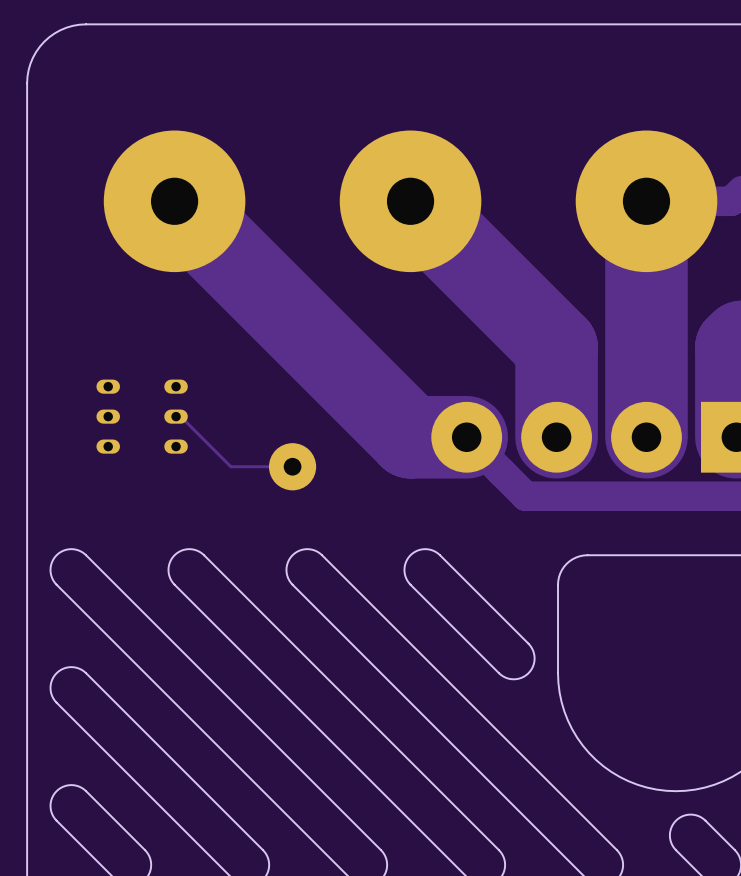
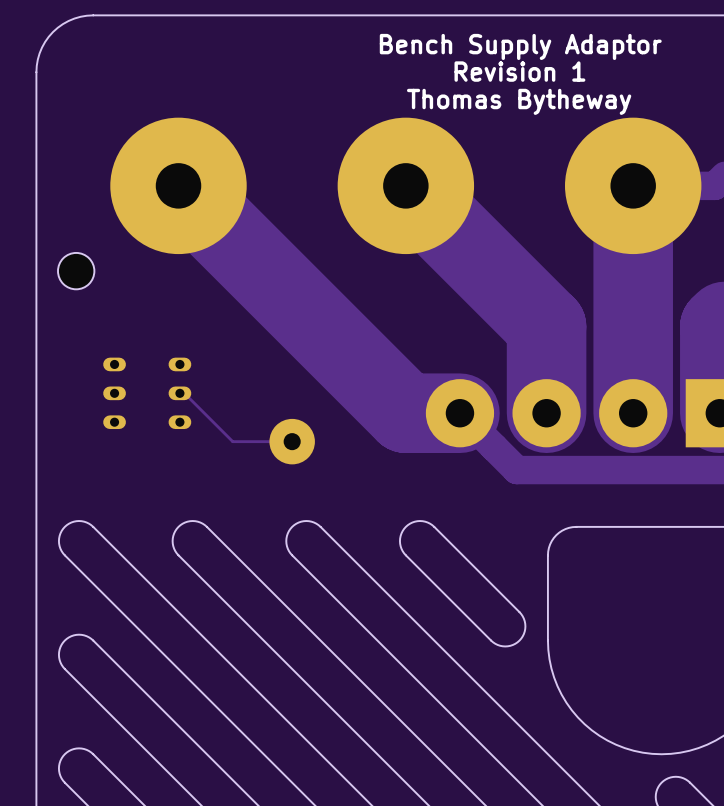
text: none -> Bench Supply Adaptor (520, 46)
text: none -> Revision 1 (519, 71)
text: none -> Thomas Bytheway (519, 101)
part: none -> (76, 271)

